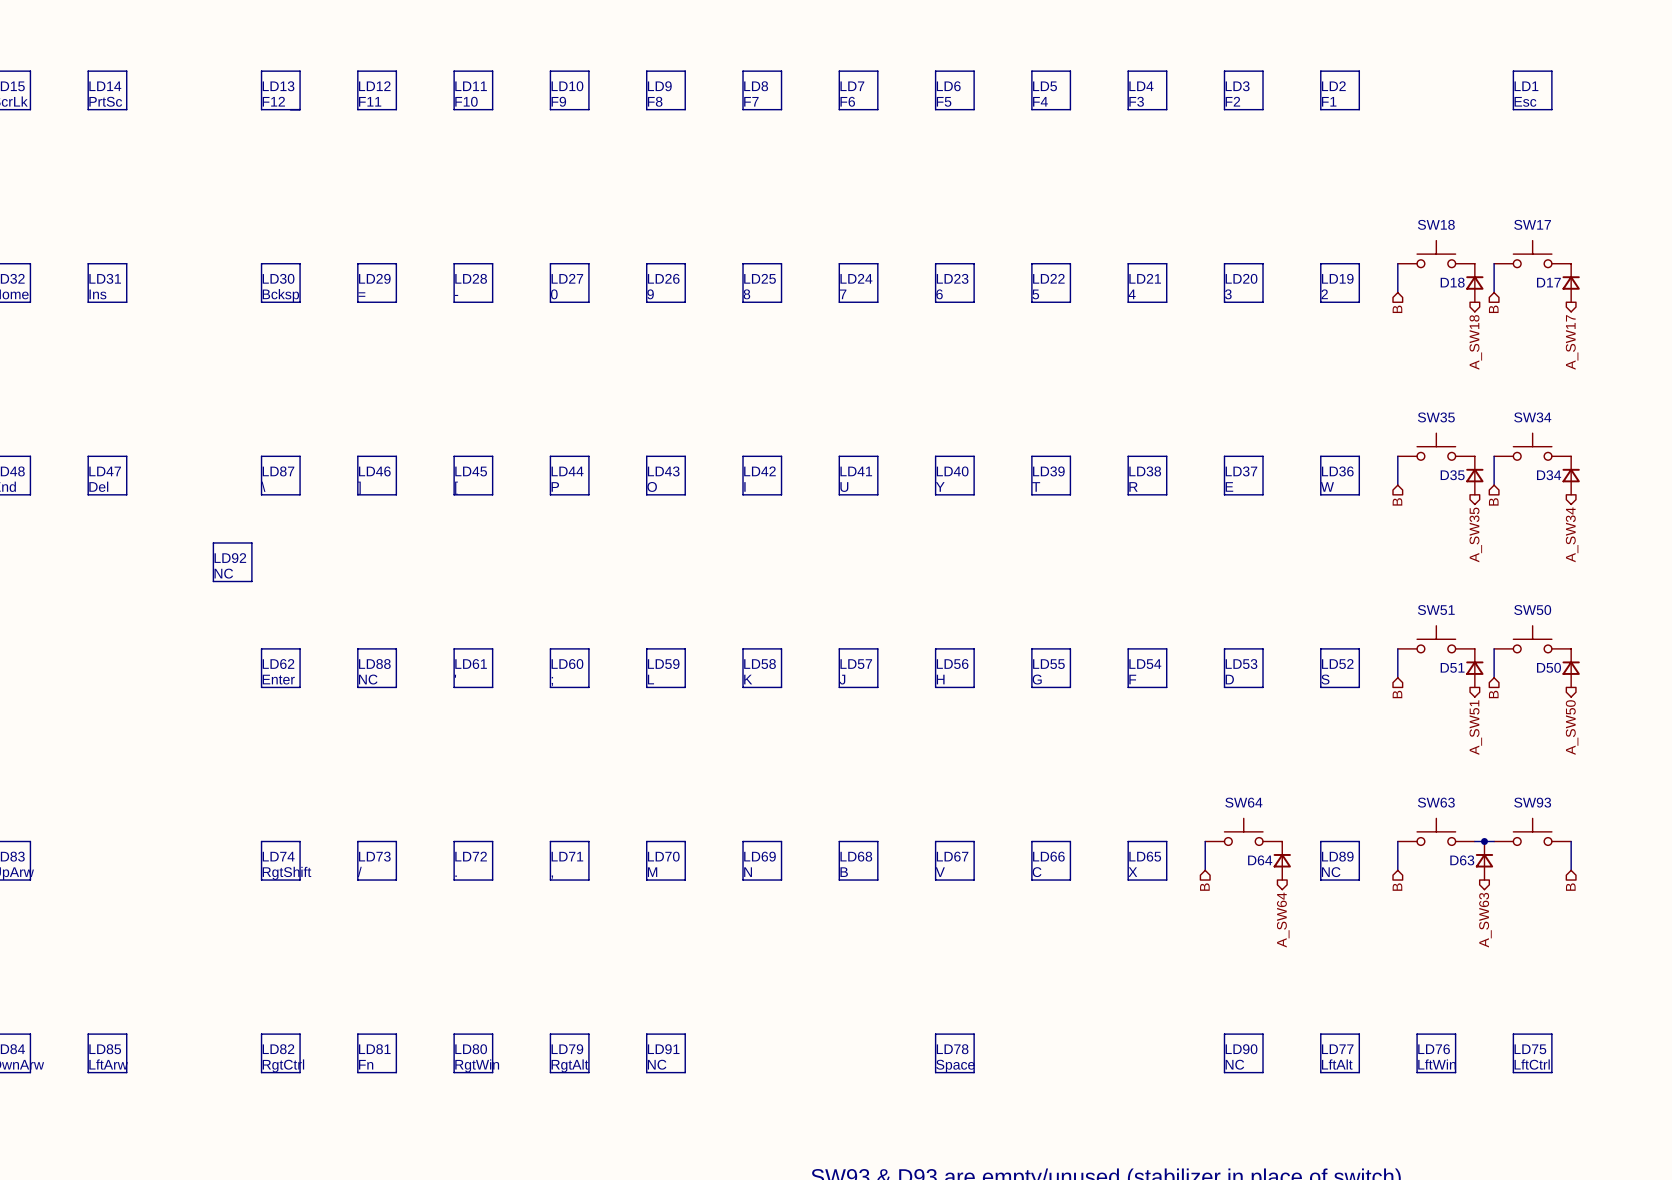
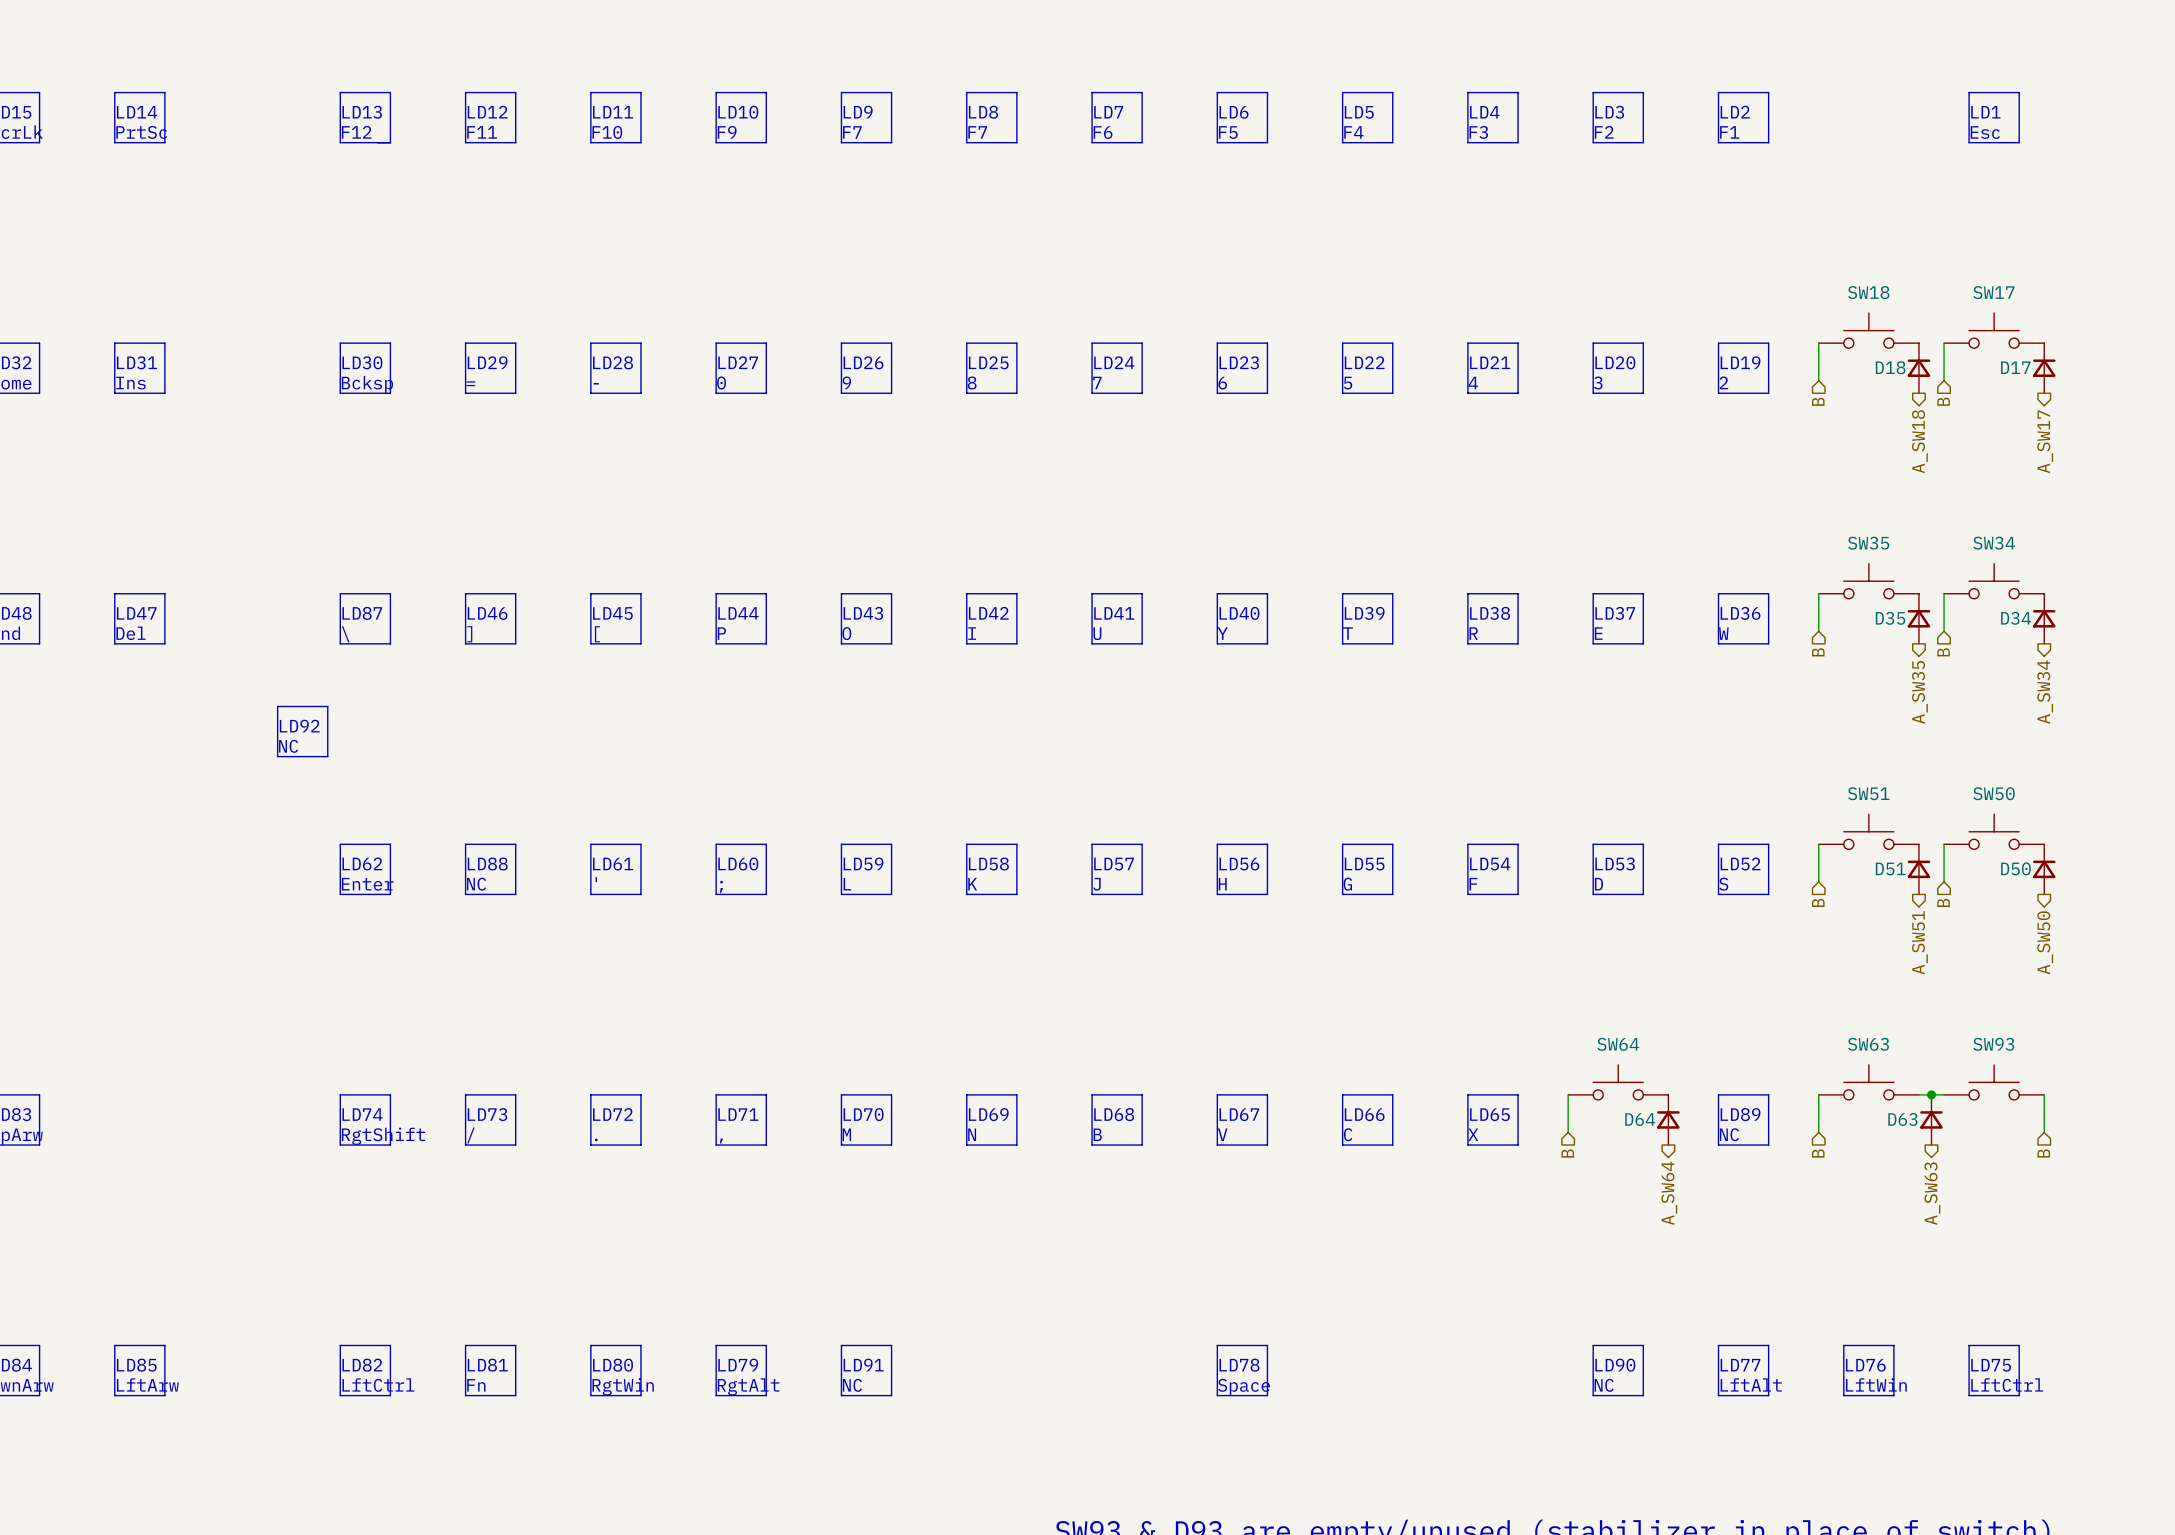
text: F8 (655, 101) -> F7 (852, 132)
text: RgtCtrl (283, 1065) -> LftCtrl (378, 1385)

